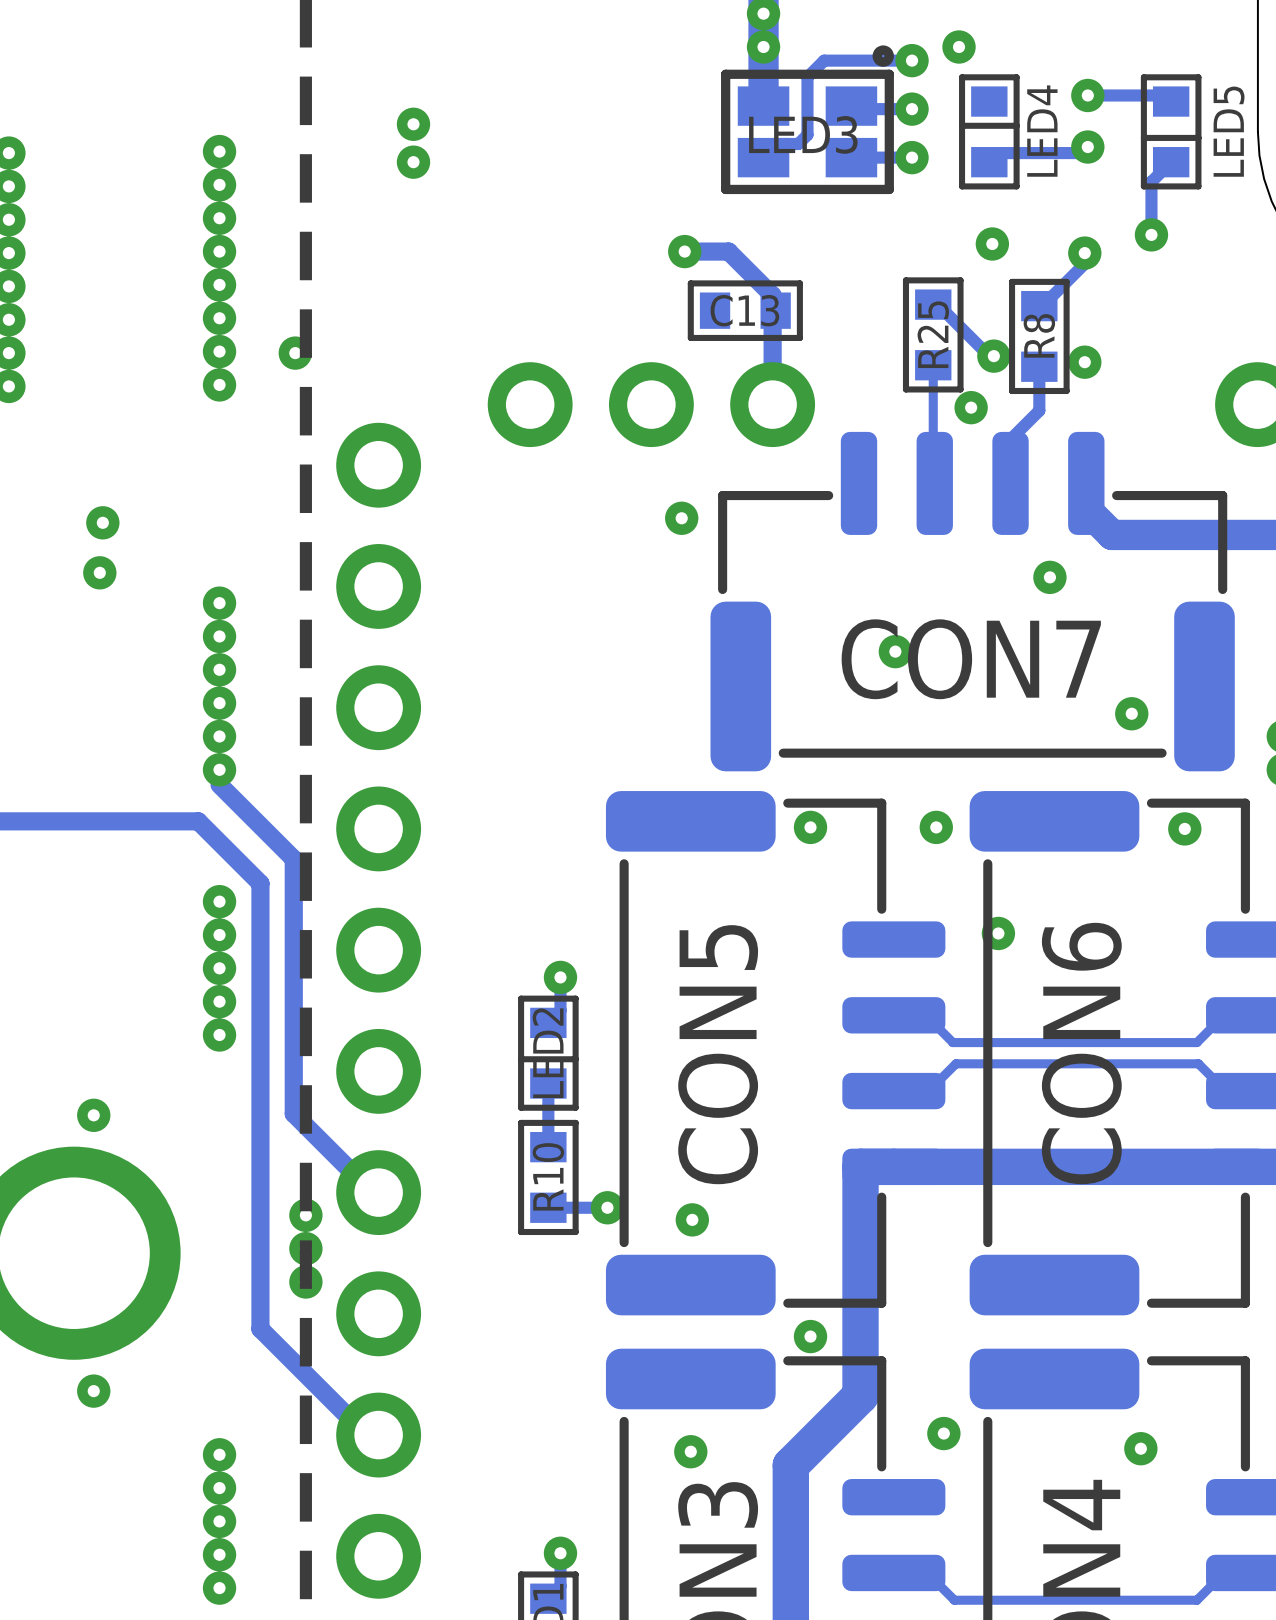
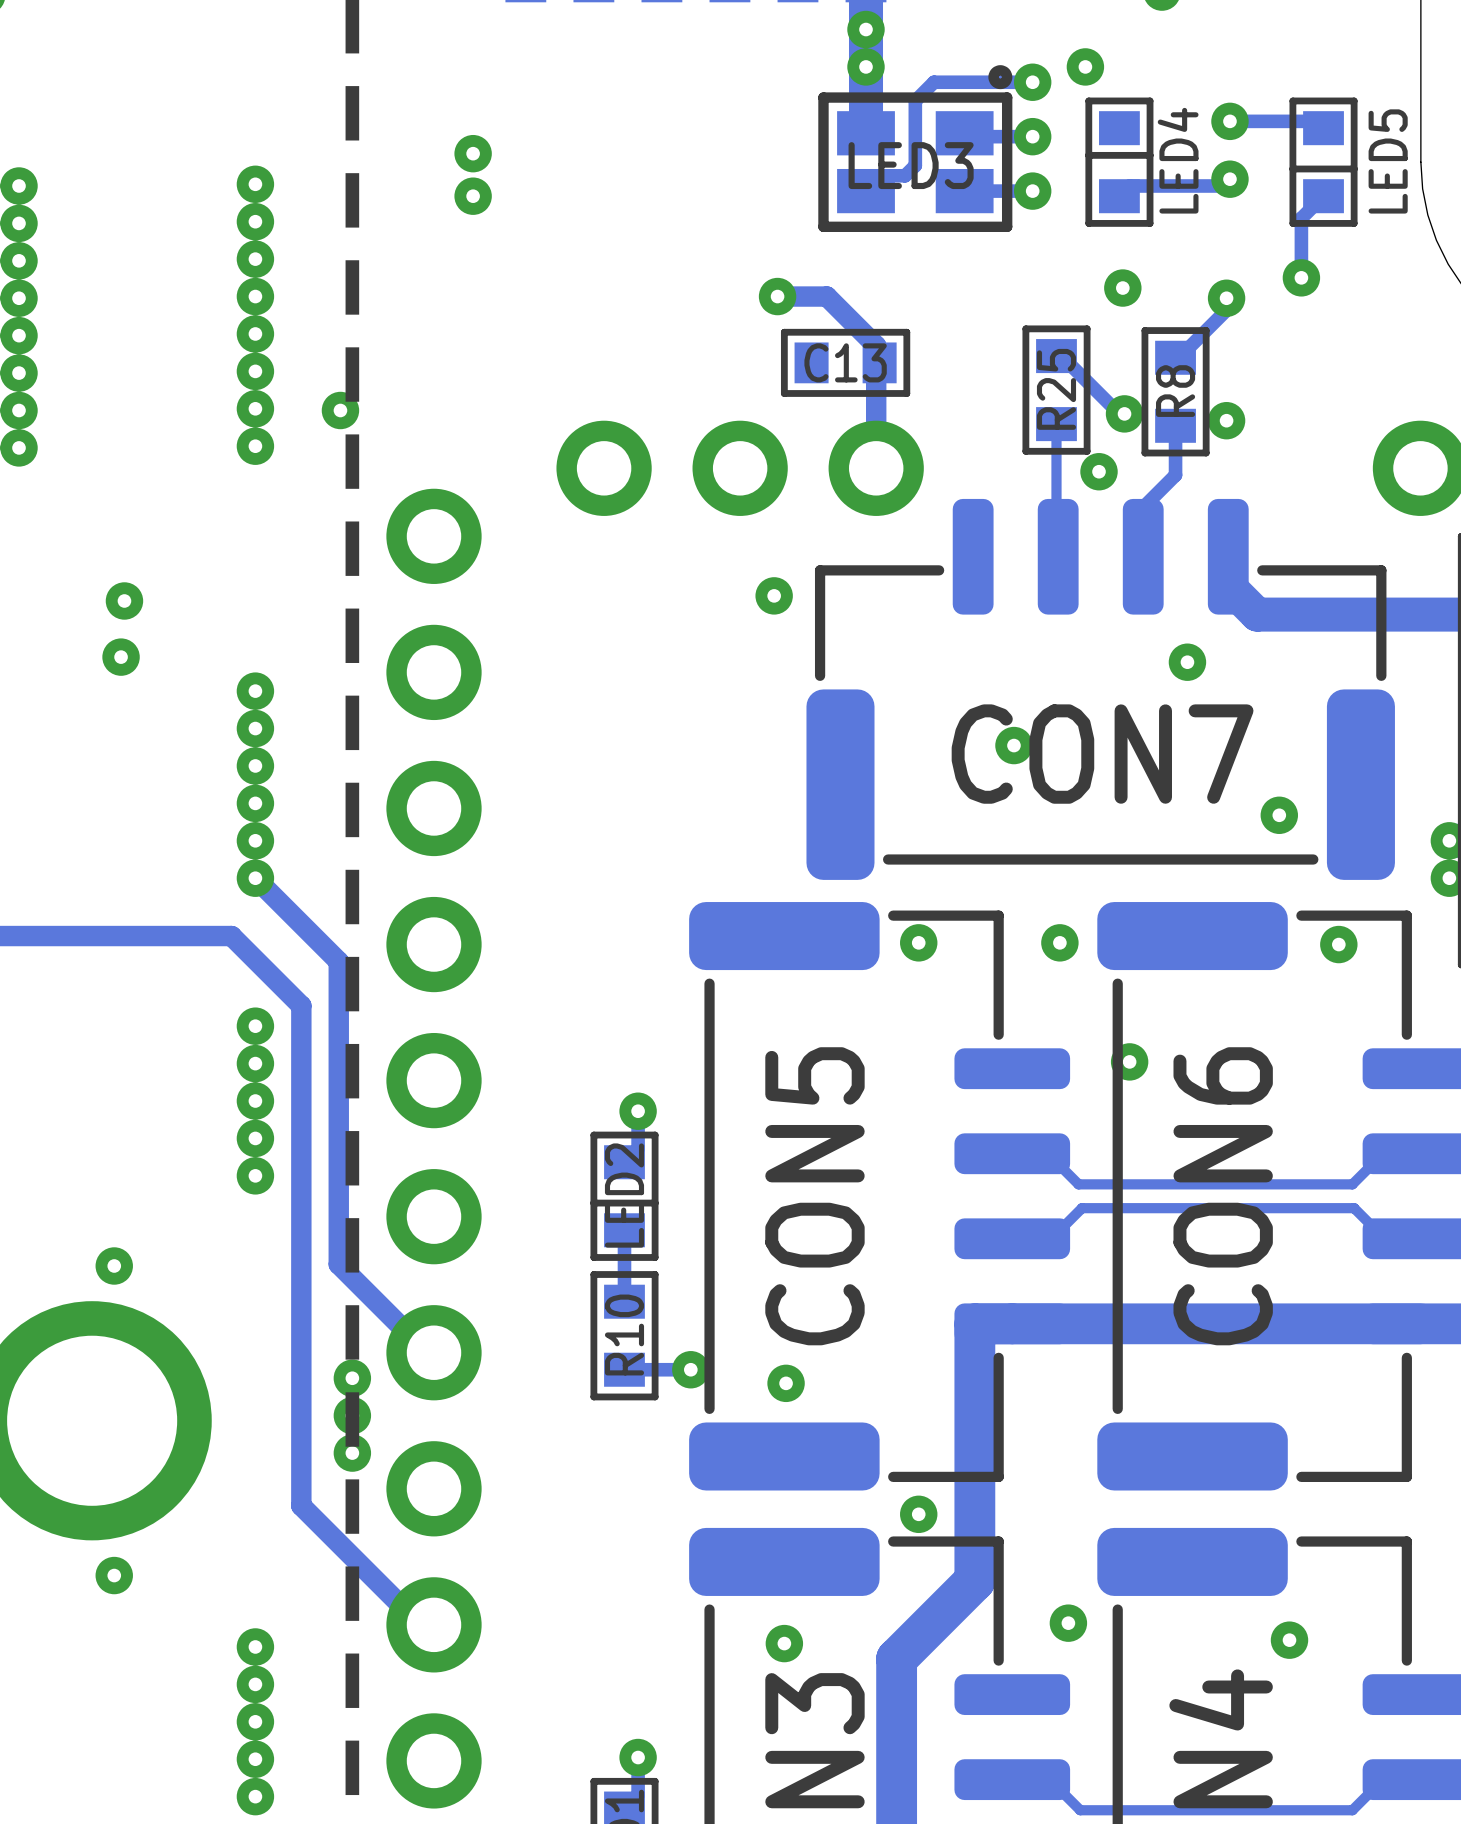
track: (219, 784) (293, 859) -> (255, 878) (338, 961) (338, 978)

